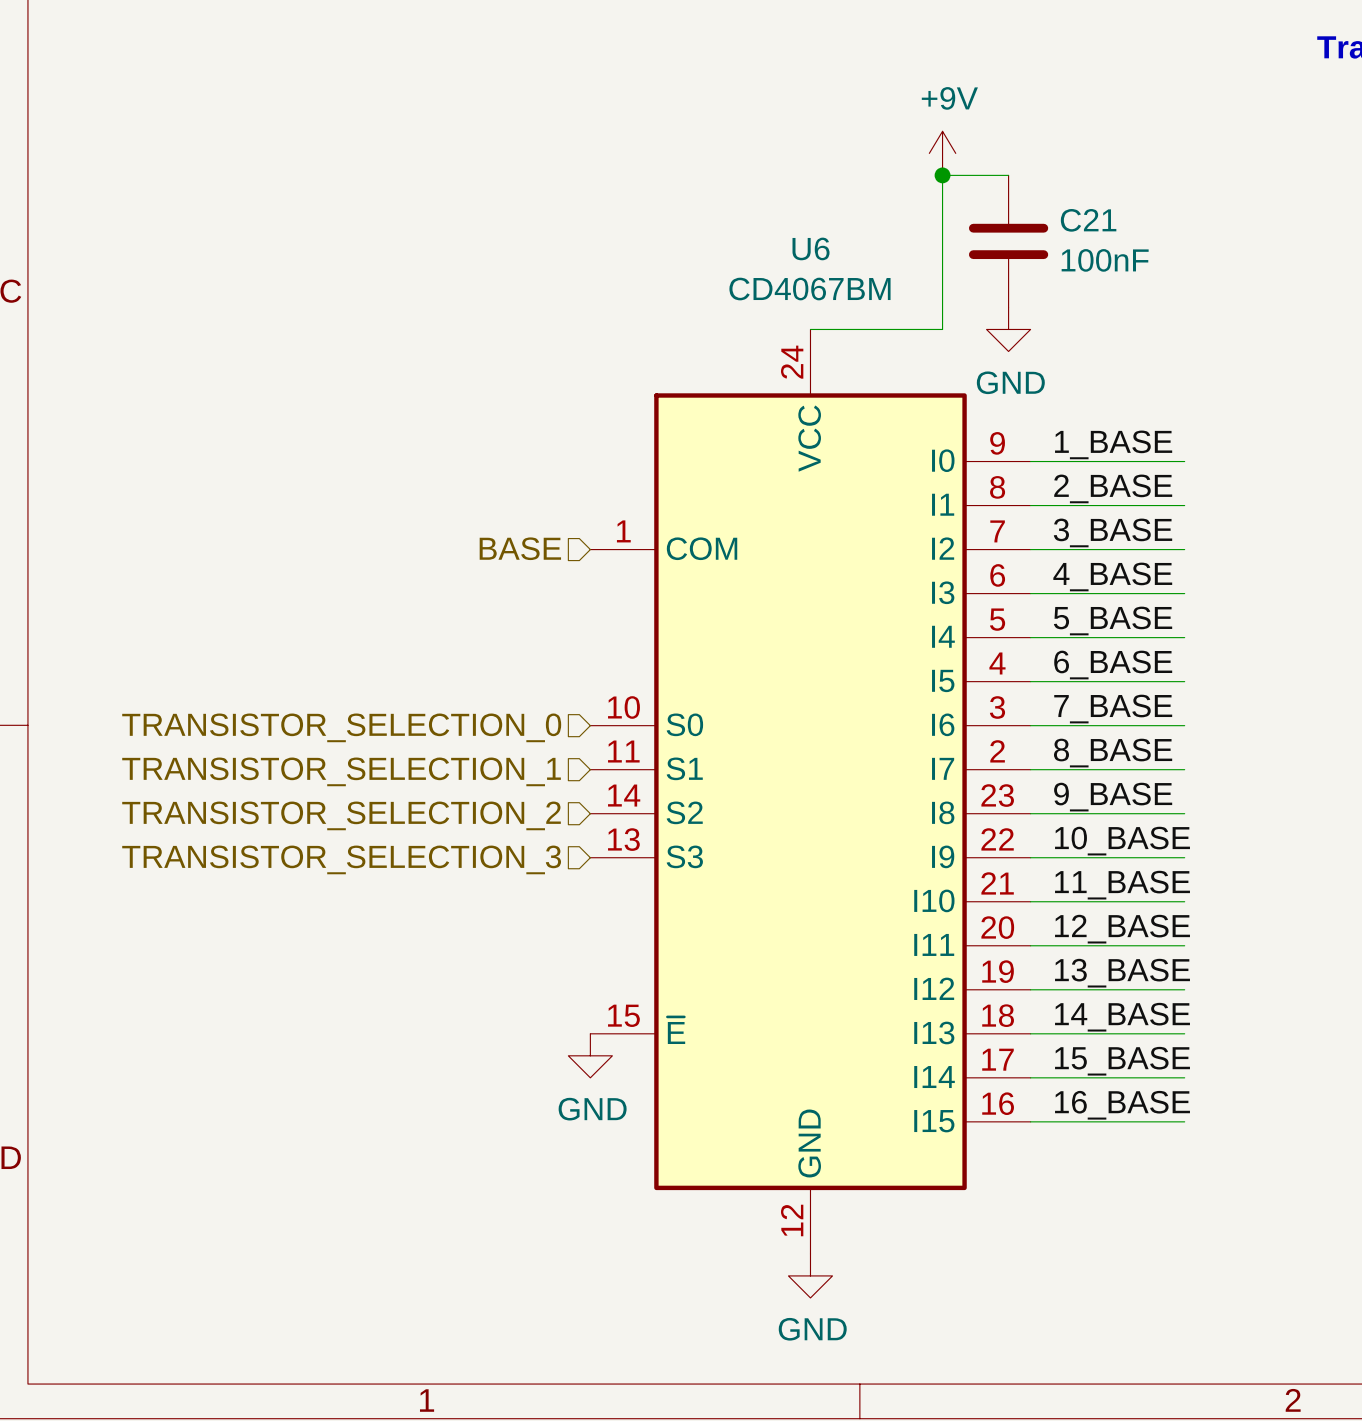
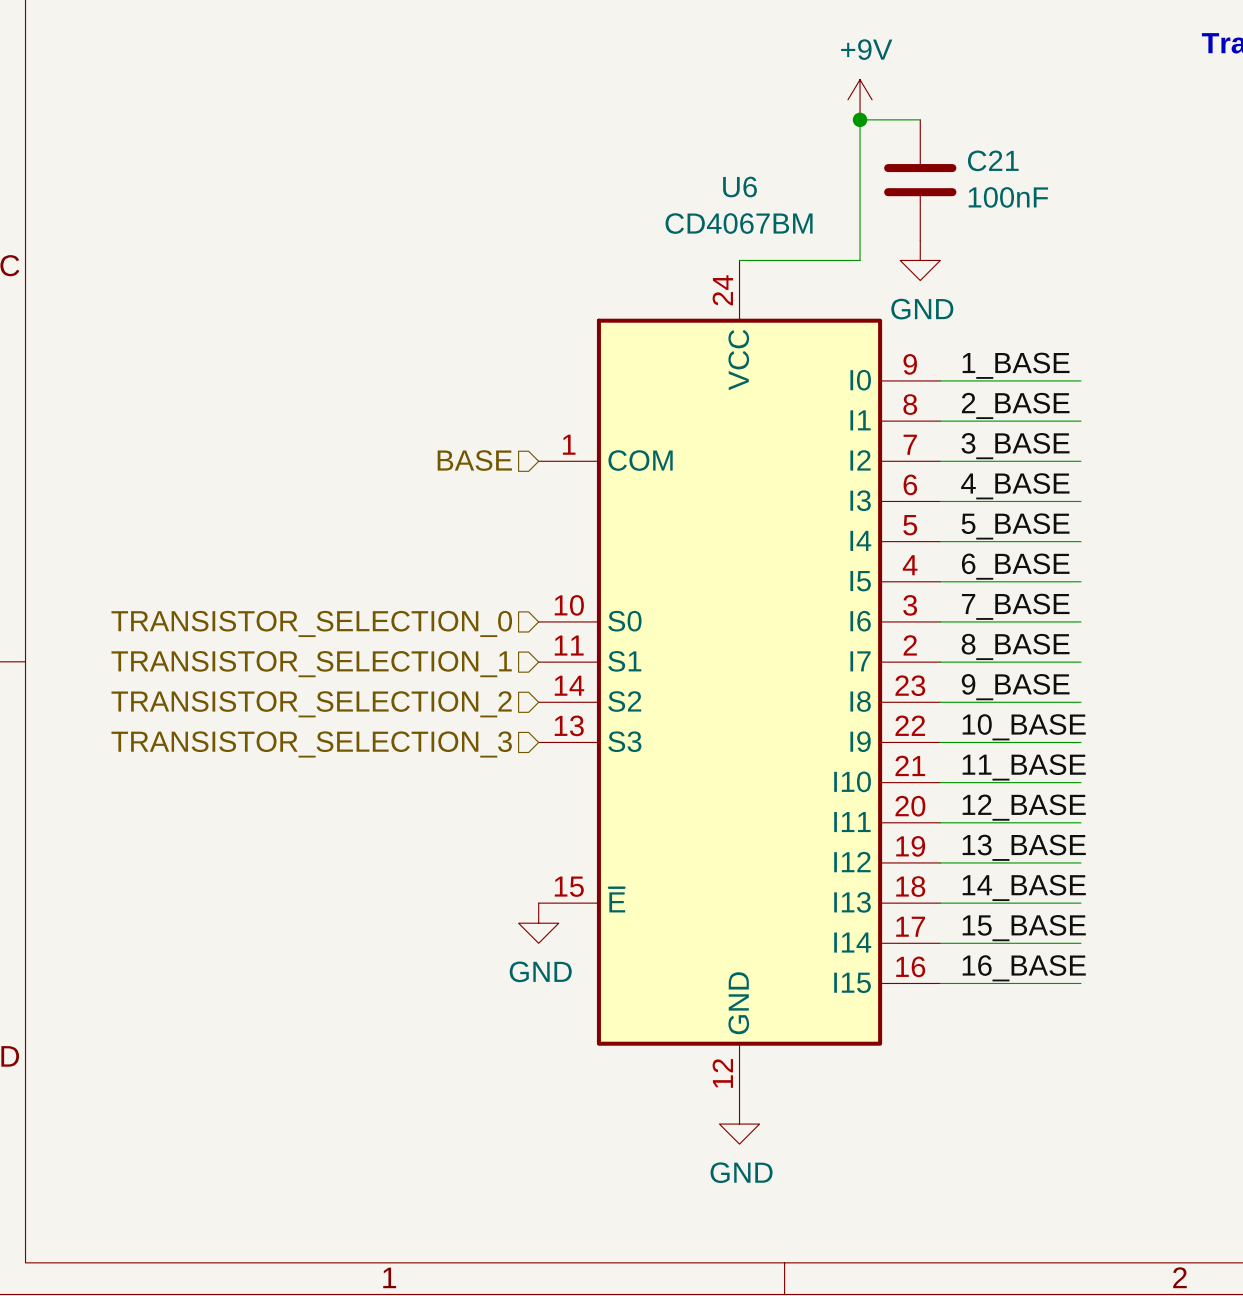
power symbol position: +9V (942, 153) -> +9V (860, 99)
wire: (942, 175) (1008, 175) -> (860, 160) (860, 119) (920, 119)
junction position: (942, 175) -> (860, 119)
C21 position: (1008, 241) -> (920, 180)
wire: (942, 285) (942, 329) (810, 329) -> (860, 260) (739, 260)
power symbol position: GND (1008, 329) -> GND (920, 260)
label: none -> 1_BASE (1016, 365)
wire: none -> (940, 380) (1080, 380)
label: 1_BASE (1113, 444) -> 2_BASE (1015, 405)
label: 2_BASE (1113, 488) -> 3_BASE (1015, 446)
label: 3_BASE (1113, 532) -> 4_BASE (1015, 486)
hierarchical label position: BASE (520, 548) -> BASE (474, 460)
label: 4_BASE (1112, 576) -> 5_BASE (1015, 526)
label: 5_BASE (1113, 620) -> 6_BASE (1015, 566)
label: 6_BASE (1113, 665) -> 7_BASE (1015, 606)
hierarchical label: none -> TRANSISTOR_SELECTION_0 (311, 623)
label: 7_BASE (1113, 709) -> 8_BASE (1015, 646)
hierarchical label: TRANSISTOR_SELECTION_0 (341, 727) -> TRANSISTOR_SELECTION_1 (311, 664)
label: 8_BASE (1113, 753) -> 9_BASE (1015, 687)
hierarchical label: TRANSISTOR_SELECTION_1 (341, 771) -> TRANSISTOR_SELECTION_2 (311, 704)
U6 position: (810, 791) -> (739, 682)
label: 9_BASE (1113, 797) -> 10_BASE (1024, 727)
hierarchical label: TRANSISTOR_SELECTION_2 (341, 815) -> TRANSISTOR_SELECTION_3 (311, 744)
label: 10_BASE (1122, 841) -> 11_BASE (1024, 767)
hierarchical label: TRANSISTOR_SELECTION_3 (341, 859) -> none
label: 11_BASE (1122, 885) -> 12_BASE (1024, 807)
label: 12_BASE (1122, 929) -> 13_BASE (1024, 847)
label: 13_BASE (1122, 973) -> 14_BASE (1024, 887)
label: 14_BASE (1122, 1017) -> 15_BASE (1024, 928)
power symbol position: GND (590, 1055) -> GND (538, 923)
label: 15_BASE (1122, 1061) -> 16_BASE (1024, 968)
label: 16_BASE (1122, 1105) -> none
wire: (1030, 1121) (1184, 1121) -> none
power symbol position: GND (810, 1275) -> GND (739, 1124)

